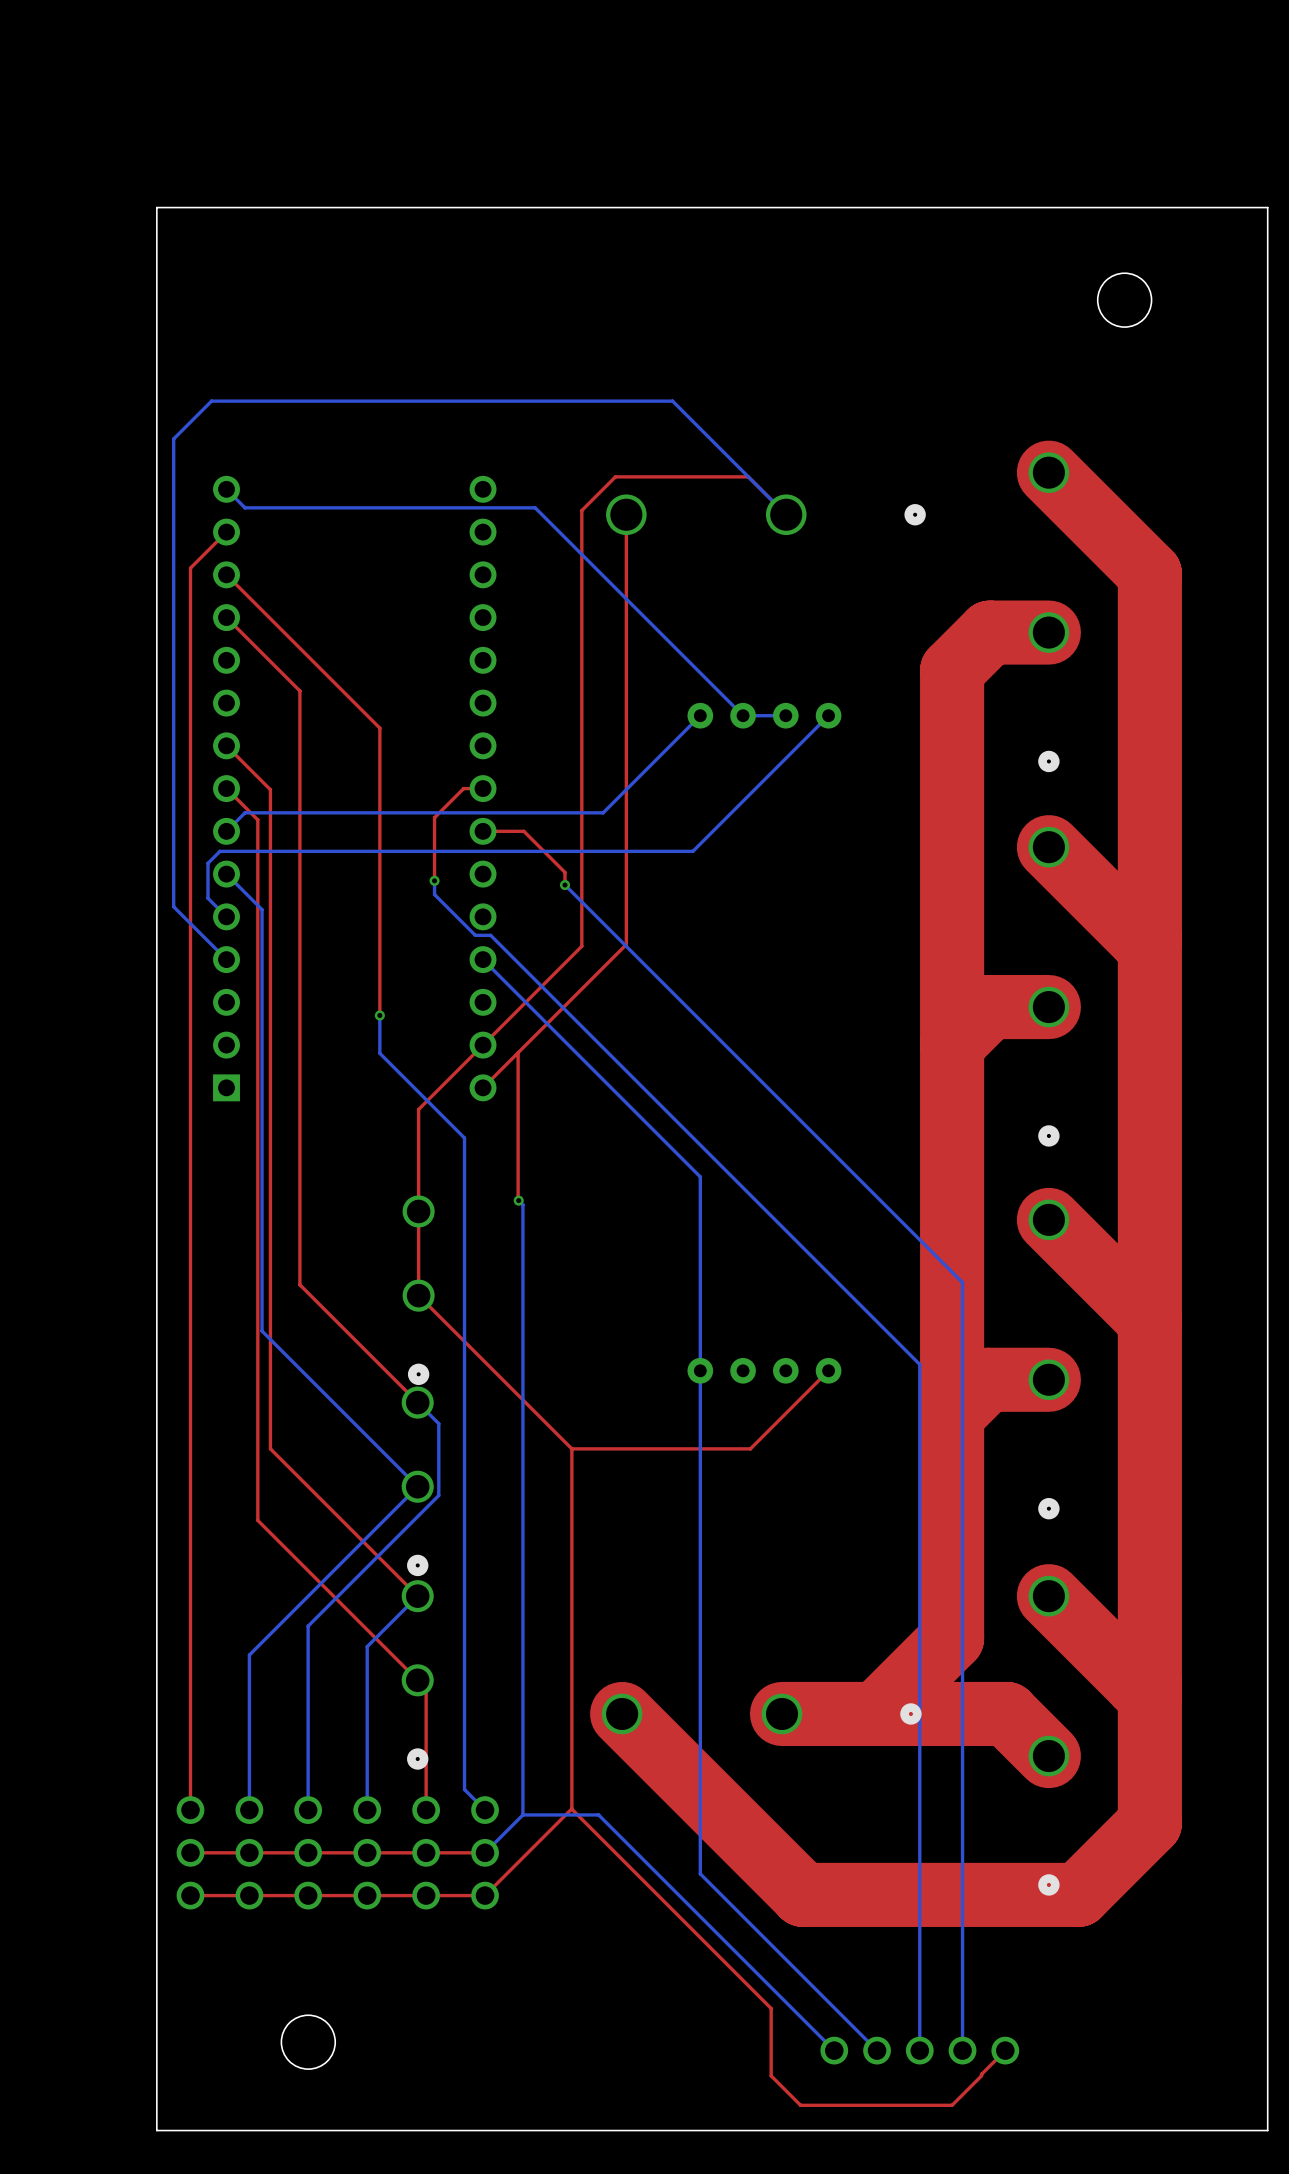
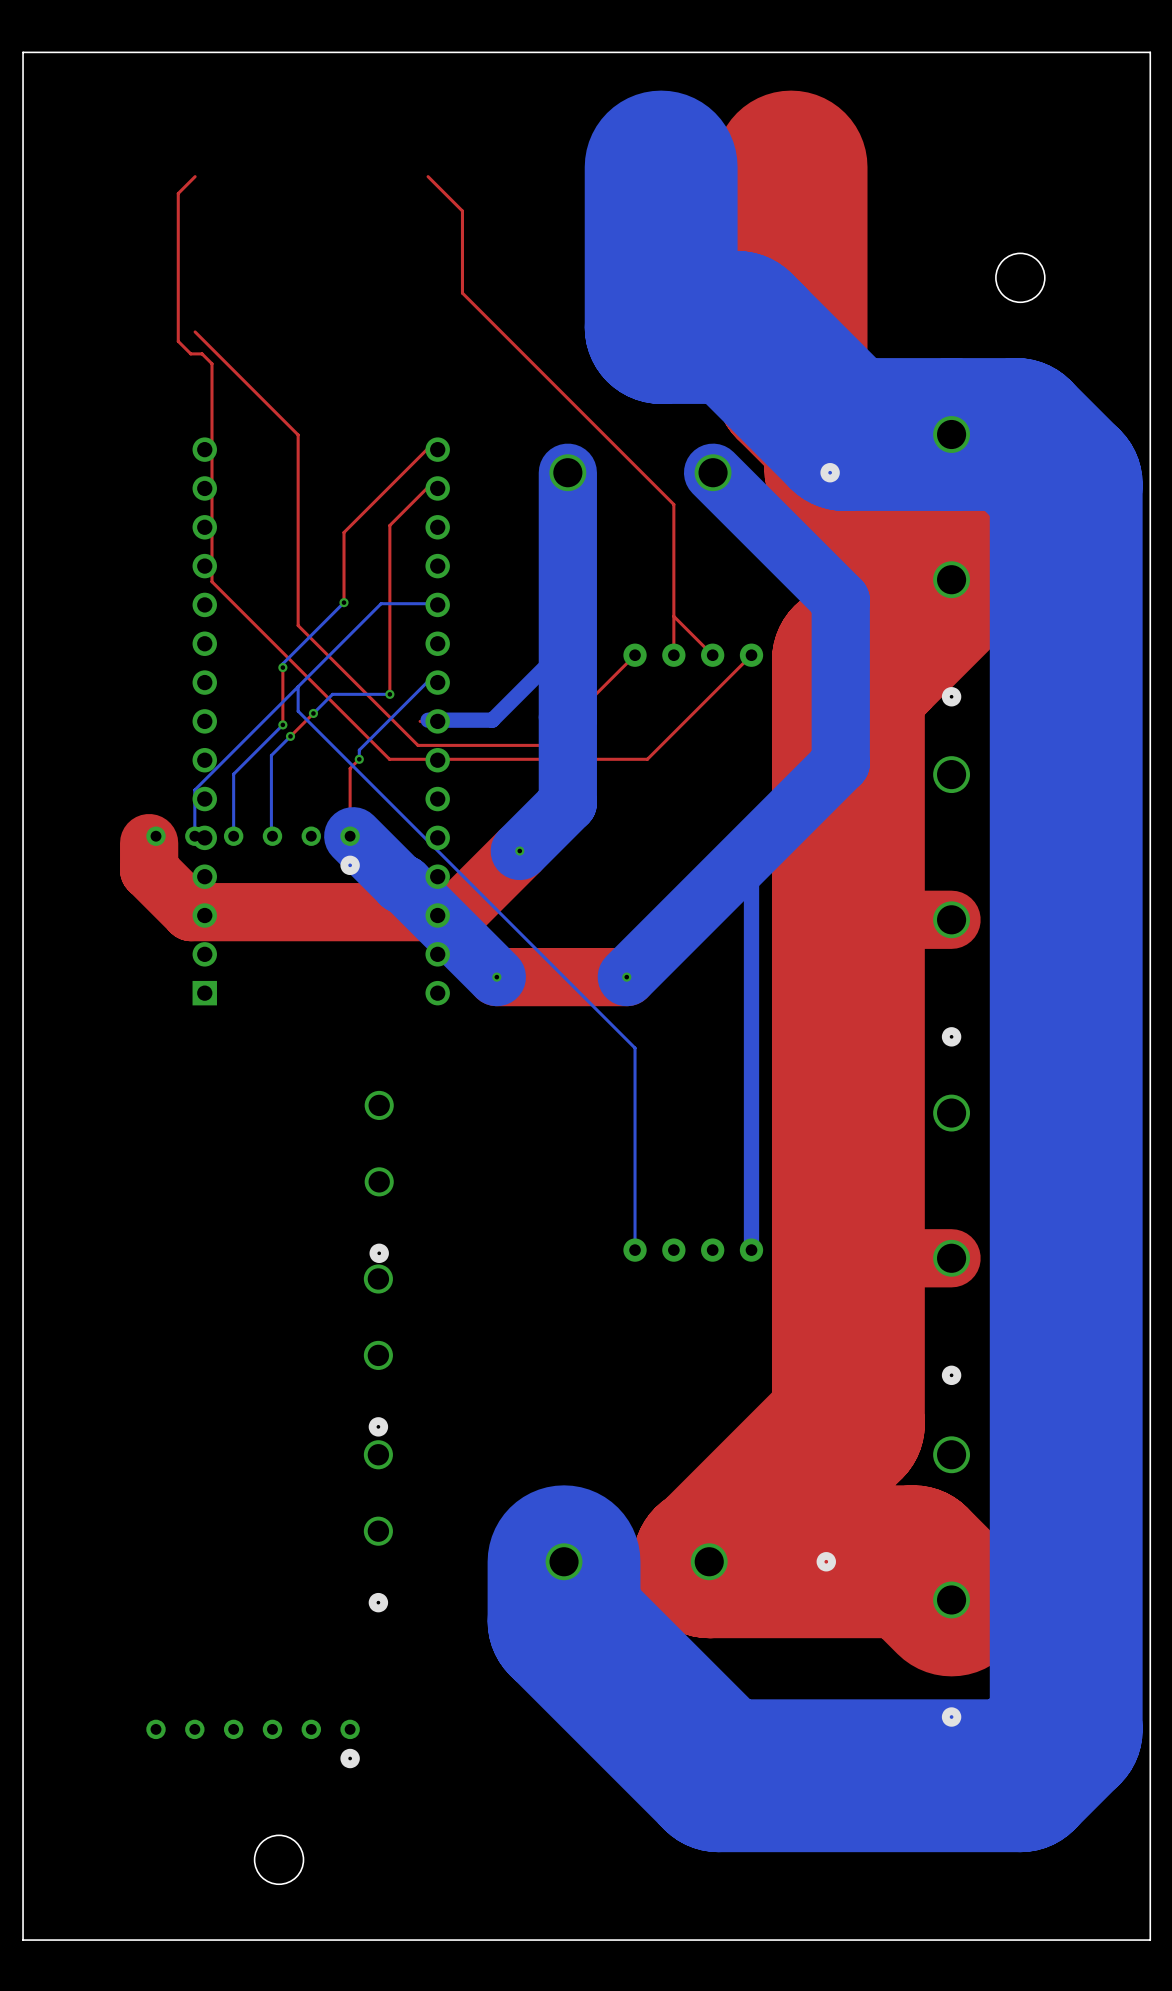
bottom track: none -> (661, 167) (661, 327) (737, 327) (844, 434) (1016, 434) (1066, 484) (1066, 1729) (1020, 1775) (718, 1775) (564, 1621) (564, 1561)
top track: none -> (791, 167) (791, 384) (840, 434) (840, 468) (951, 579) (871, 659) (848, 659) (848, 1424) (710, 1561)
top track: none -> (195, 176) (178, 193) (178, 341) (190, 353) (202, 353) (211, 363) (211, 581) (389, 759) (647, 759) (751, 655)
top track: none -> (428, 176) (462, 211) (462, 293) (673, 504) (673, 655)
board edge: (1267, 207) (156, 207) (156, 2130) -> (1150, 193) (1150, 52) (23, 52) (23, 1940) (141, 1940)
top track: none -> (195, 331) (298, 434) (298, 625) (417, 745) (544, 745) (635, 655)
top track: (1048, 472) (1149, 573) (1149, 1823) (1078, 1894) (803, 1894) (622, 1713) -> none
top track: none -> (428, 448) (344, 532) (344, 602)
bottom track: (226, 489) (245, 507) (535, 507) (743, 715) (785, 715) -> none
top track: (626, 514) (626, 944) (483, 1087) -> none
bottom track: none -> (567, 472) (567, 802) (519, 851)
top track: (786, 514) (748, 476) (615, 476) (581, 510) (581, 946) (418, 1109) (418, 1295) (571, 1448) -> none
bottom track: (786, 514) (672, 401) (211, 401) (173, 439) (173, 906) (226, 959) -> (713, 472) (840, 600) (840, 763) (626, 977)
top track: none -> (428, 487) (389, 525) (389, 694)
top track: (226, 532) (190, 568) (190, 1810) -> none
top track: (226, 574) (379, 728) (379, 1015) -> none
top track: (226, 617) (299, 690) (299, 1284) (417, 1402) -> none
top track: (1048, 632) (989, 632) (952, 670) (952, 1638) (876, 1713) -> none
bottom track: none -> (344, 602) (282, 663) (282, 667)
via: none -> (344, 602)
bottom track: none -> (428, 603) (381, 603) (194, 790) (194, 836)
top track: none -> (673, 616) (712, 655)
bottom track: none -> (567, 644) (492, 720) (428, 720)
bottom track: (700, 715) (603, 812) (245, 812) (226, 831) -> none
bottom track: (828, 715) (692, 851) (219, 851) (208, 863) (208, 898) (226, 916) -> none
top track: none -> (282, 667) (282, 724)
via: none -> (282, 667)
bottom track: none -> (428, 681) (359, 750) (359, 759)
top track: (226, 745) (270, 789) (270, 1448) (417, 1596) -> none
bottom track: none -> (389, 694) (332, 694) (313, 713)
via: none -> (389, 694)
top track: none -> (313, 713) (290, 736)
via: none -> (313, 713)
top track: (226, 788) (257, 819) (257, 1520) (426, 1688) (426, 1810) -> none
top track: (463, 788) (434, 817) (434, 880) -> none
bottom track: none -> (282, 724) (233, 774) (233, 836)
via: none -> (282, 724)
bottom track: none -> (290, 736) (271, 755) (272, 836)
via: none -> (290, 736)
top track: none -> (359, 759) (350, 768) (350, 836)
via: none -> (359, 759)
top track: (483, 831) (523, 831) (564, 872) (564, 885) -> none
top track: (1048, 847) (1141, 939) (1149, 939) -> none
bottom track: (226, 874) (262, 909) (262, 1331) (417, 1486) (249, 1655) (249, 1810) -> none
bottom track: (434, 880) (434, 894) (475, 935) (490, 935) (919, 1364) (919, 2050) -> none
via: (434, 880) -> none
bottom track: (564, 885) (962, 1282) (962, 2050) -> none
via position: (564, 885) -> (519, 851)
bottom track: none -> (353, 836) (496, 977)
top track: none -> (149, 843) (149, 870) (191, 912) (458, 912) (519, 851)
part: none -> (253, 850)
bottom track: none -> (751, 853) (751, 1250)
bottom track: (483, 959) (700, 1176) -> (298, 686) (298, 711) (635, 1048) (635, 1074)
bottom track: (379, 1015) (379, 1053) (464, 1138) (464, 1789) (485, 1810) -> none
via: (379, 1015) -> none
top track: (518, 1052) (518, 1200) -> none
via: none -> (496, 977)
top track: none -> (626, 977) (496, 977)
via: none -> (626, 977)
bottom track: (518, 1200) (522, 1204) (522, 1814) -> none
via: (518, 1200) -> none
top track: (1048, 1219) (1149, 1320) -> none
bottom track: (700, 1370) (700, 1873) (877, 2050) -> none
top track: (828, 1370) (750, 1448) (571, 1448) -> none
bottom track: (417, 1402) (438, 1423) (438, 1495) (308, 1626) (308, 1810) -> none
top track: (571, 1448) (571, 1809) (771, 2008) (771, 2075) (800, 2105) (952, 2105) (1005, 2050) -> none
bottom track: (417, 1596) (367, 1646) (367, 1810) -> none
top track: (1048, 1596) (1149, 1697) -> none
top track width: thin (782, 1713) (1006, 1713) (1048, 1756) -> thick (709, 1561) (913, 1561) (951, 1599)
top track: (571, 1808) (485, 1895) (190, 1895) -> none
bottom track: (522, 1814) (485, 1852) -> none
bottom track: (522, 1814) (598, 1814) (834, 2050) -> none
part: (190, 1852) -> none
part: (249, 1852) -> none
part: (308, 1852) -> none
part: (367, 1852) -> none
part: (426, 1852) -> none
top track: (485, 1852) (190, 1852) -> none
part: (485, 1852) -> none
part: none -> (253, 1743)
part: (919, 2050) -> none

